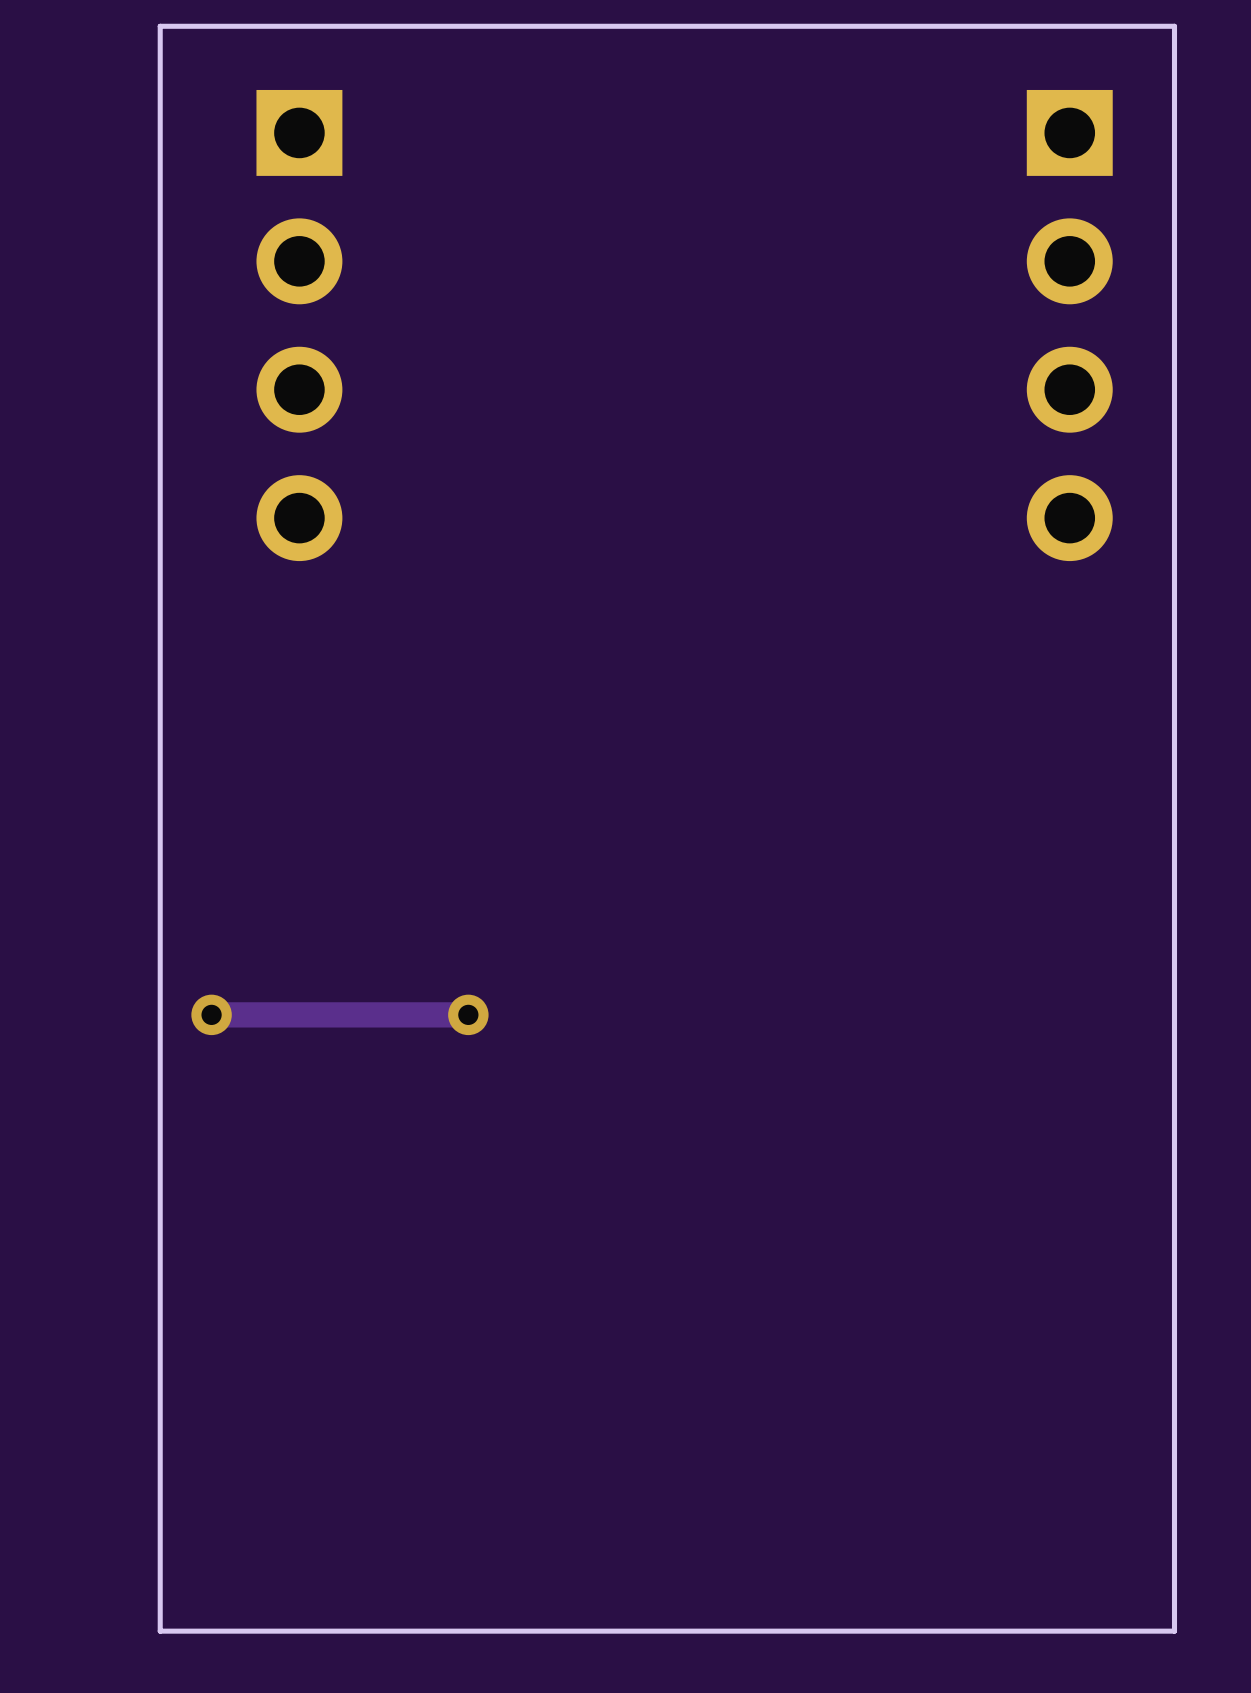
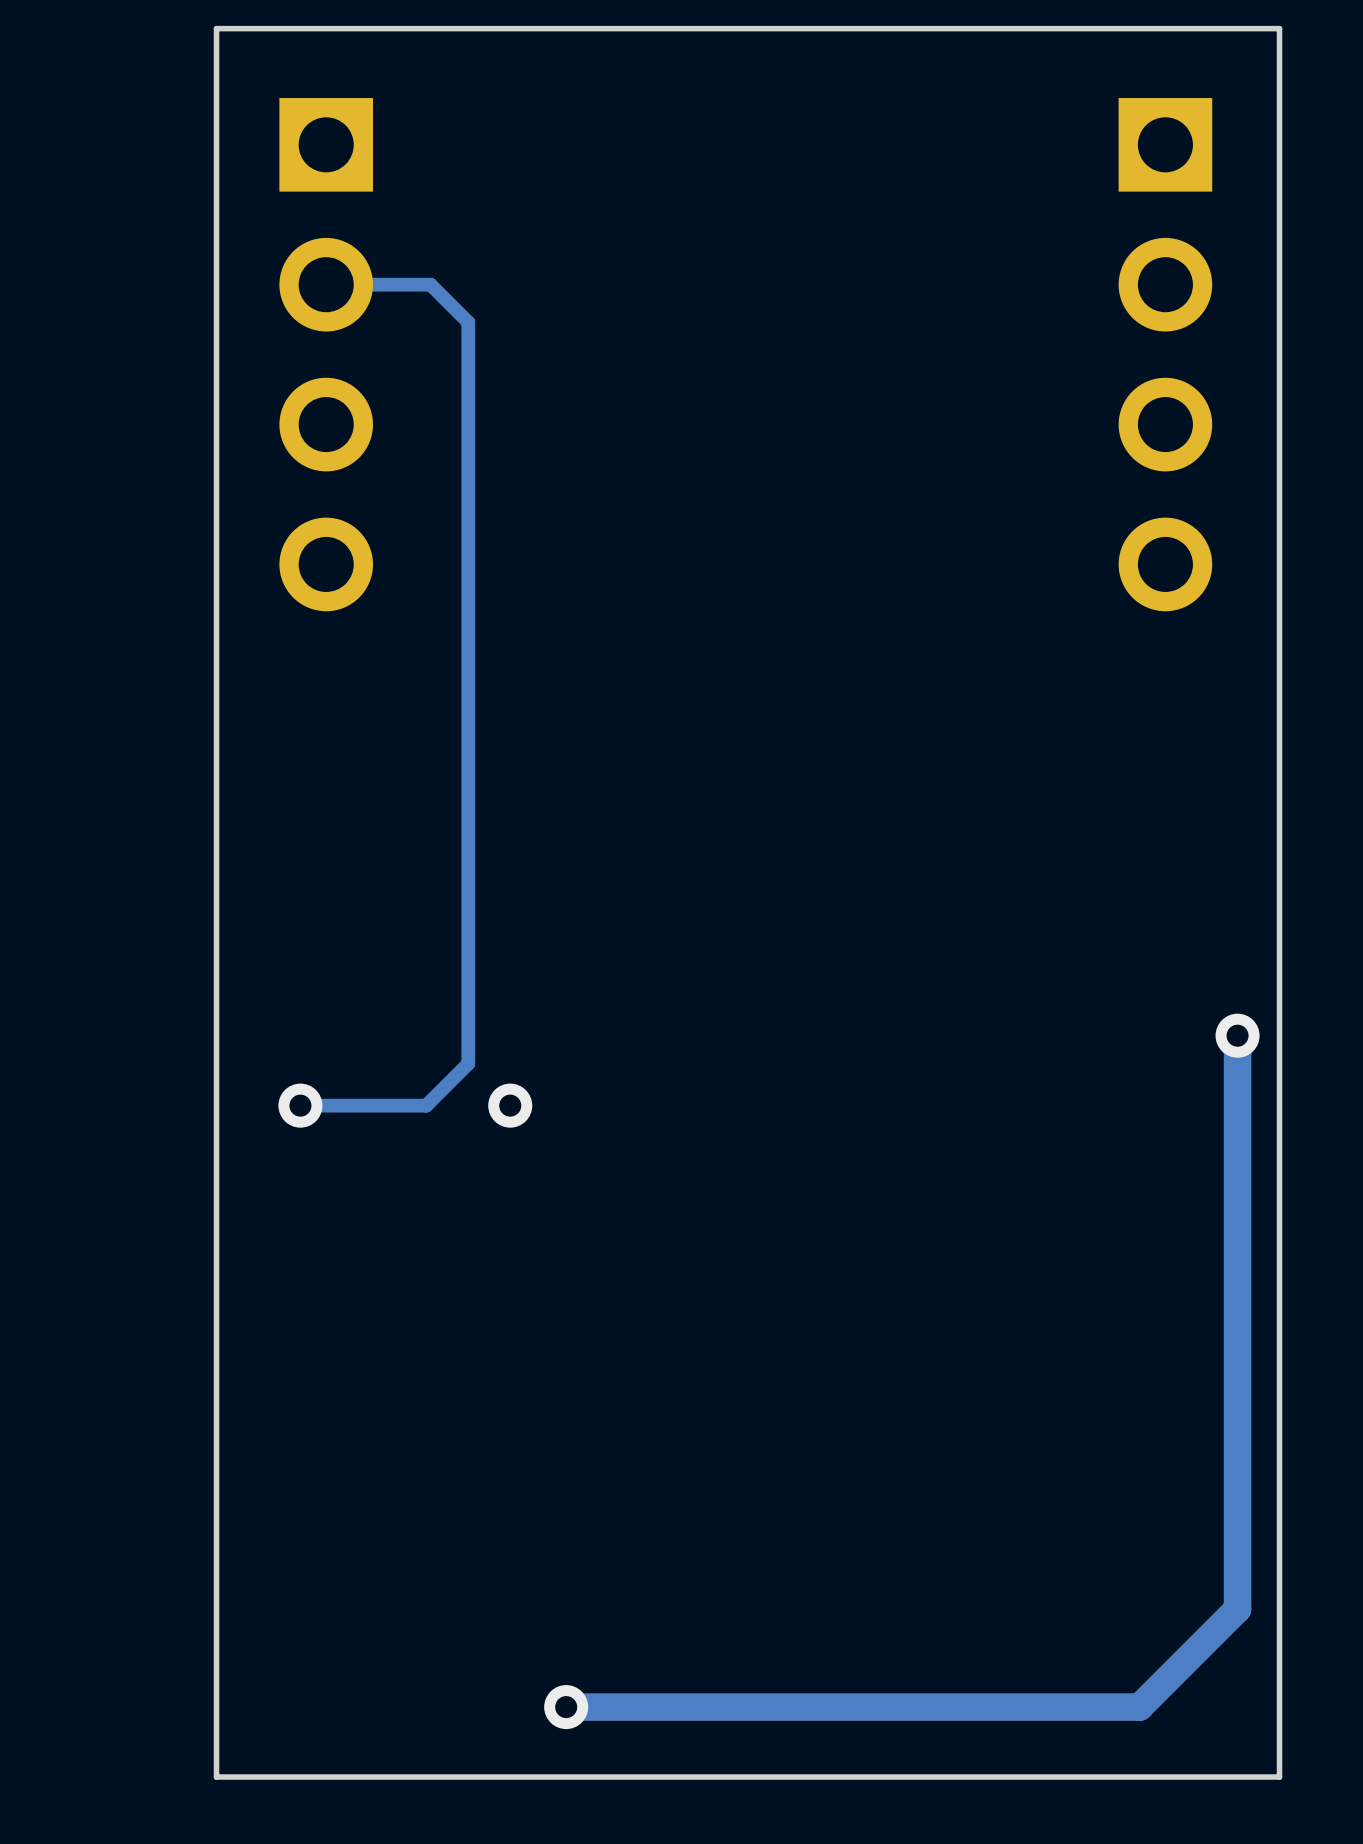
board edge: (198, 26) (160, 26) (160, 1631) (198, 1631) -> (216, 28) (216, 1777)
track: none -> (1237, 1035) (1237, 1609) (1139, 1707) (566, 1707)
via: none -> (1237, 1035)
via position: (211, 1014) -> (300, 1105)
track: (275, 1014) (211, 1014) -> none
track width: thick (391, 1014) (275, 1014) -> thin (426, 1105) (300, 1105)
track: (468, 1014) (391, 1014) -> (326, 284) (430, 284) (468, 322) (468, 1063) (426, 1105)
via: none -> (566, 1707)

